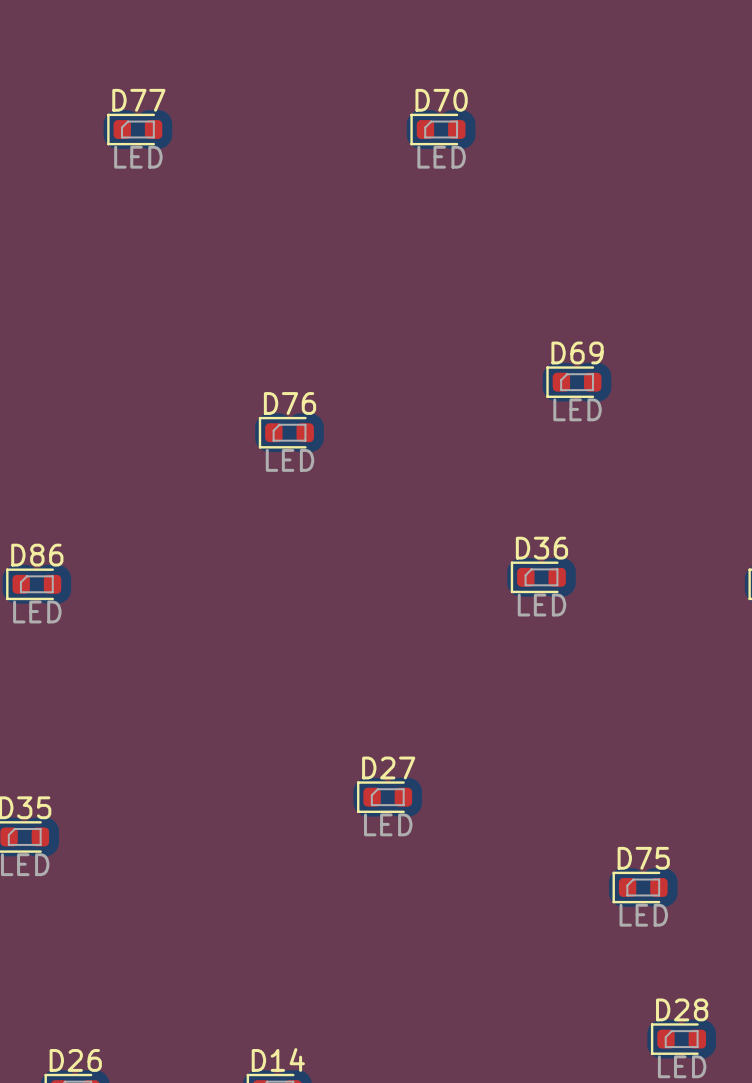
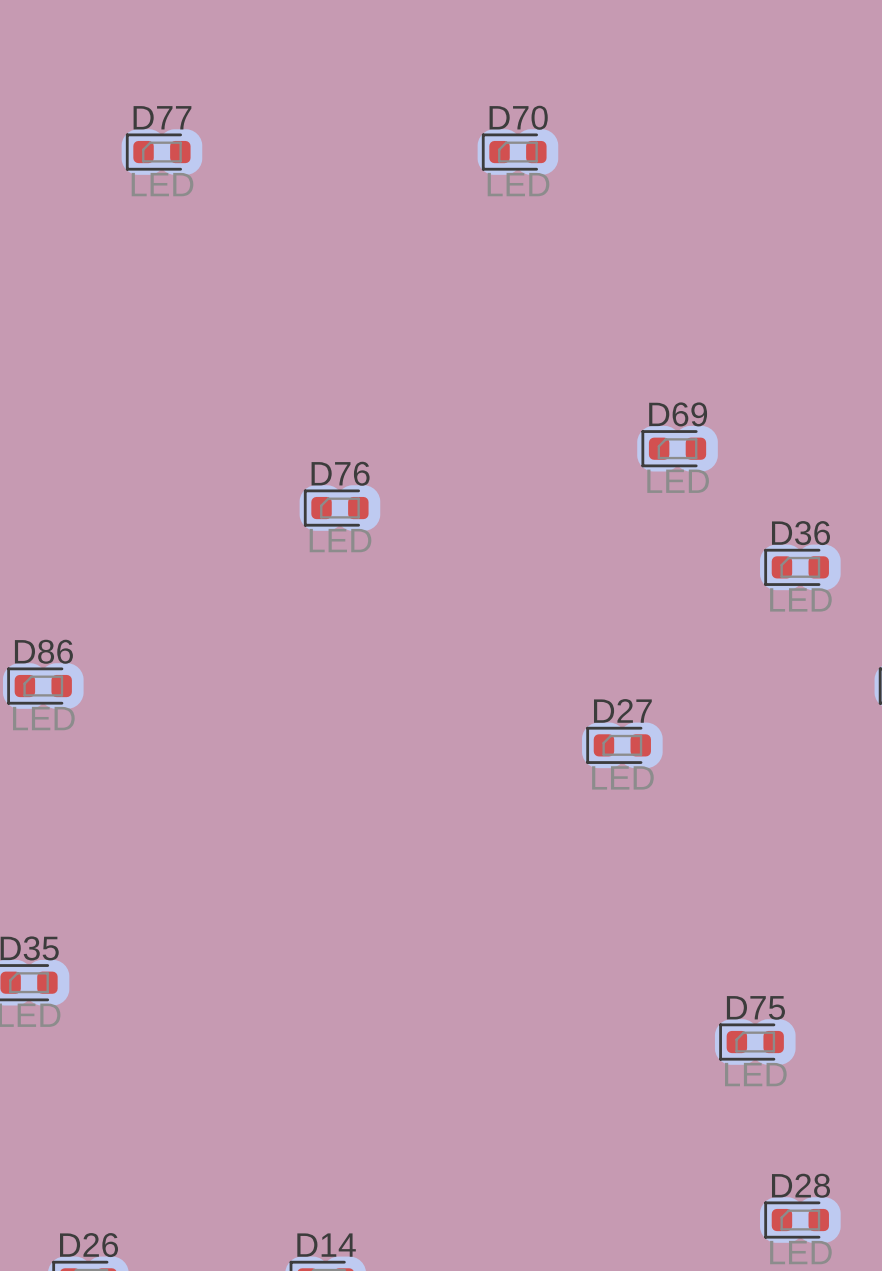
D36 position: (538, 577) -> (796, 567)
D27 position: (384, 797) -> (618, 745)

